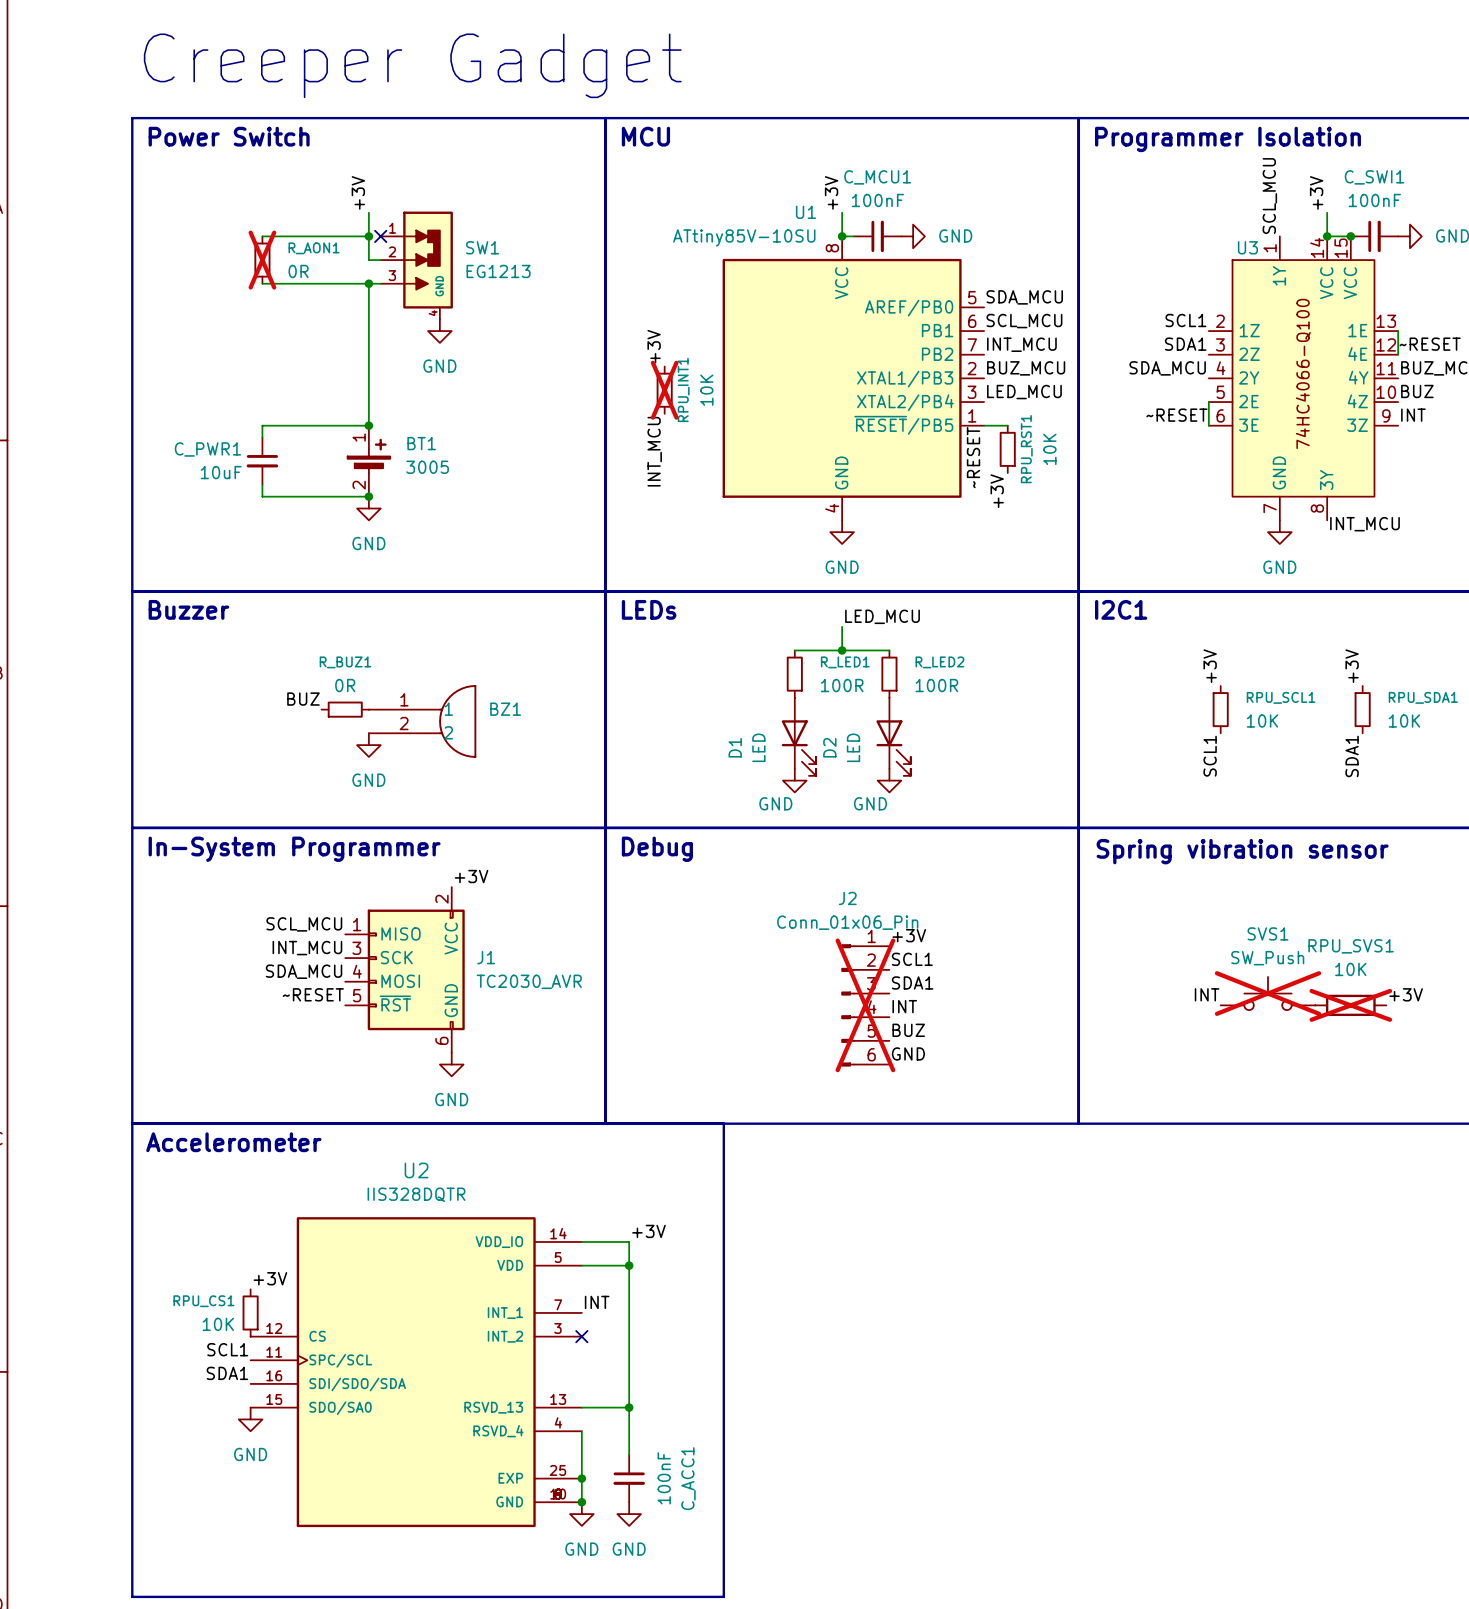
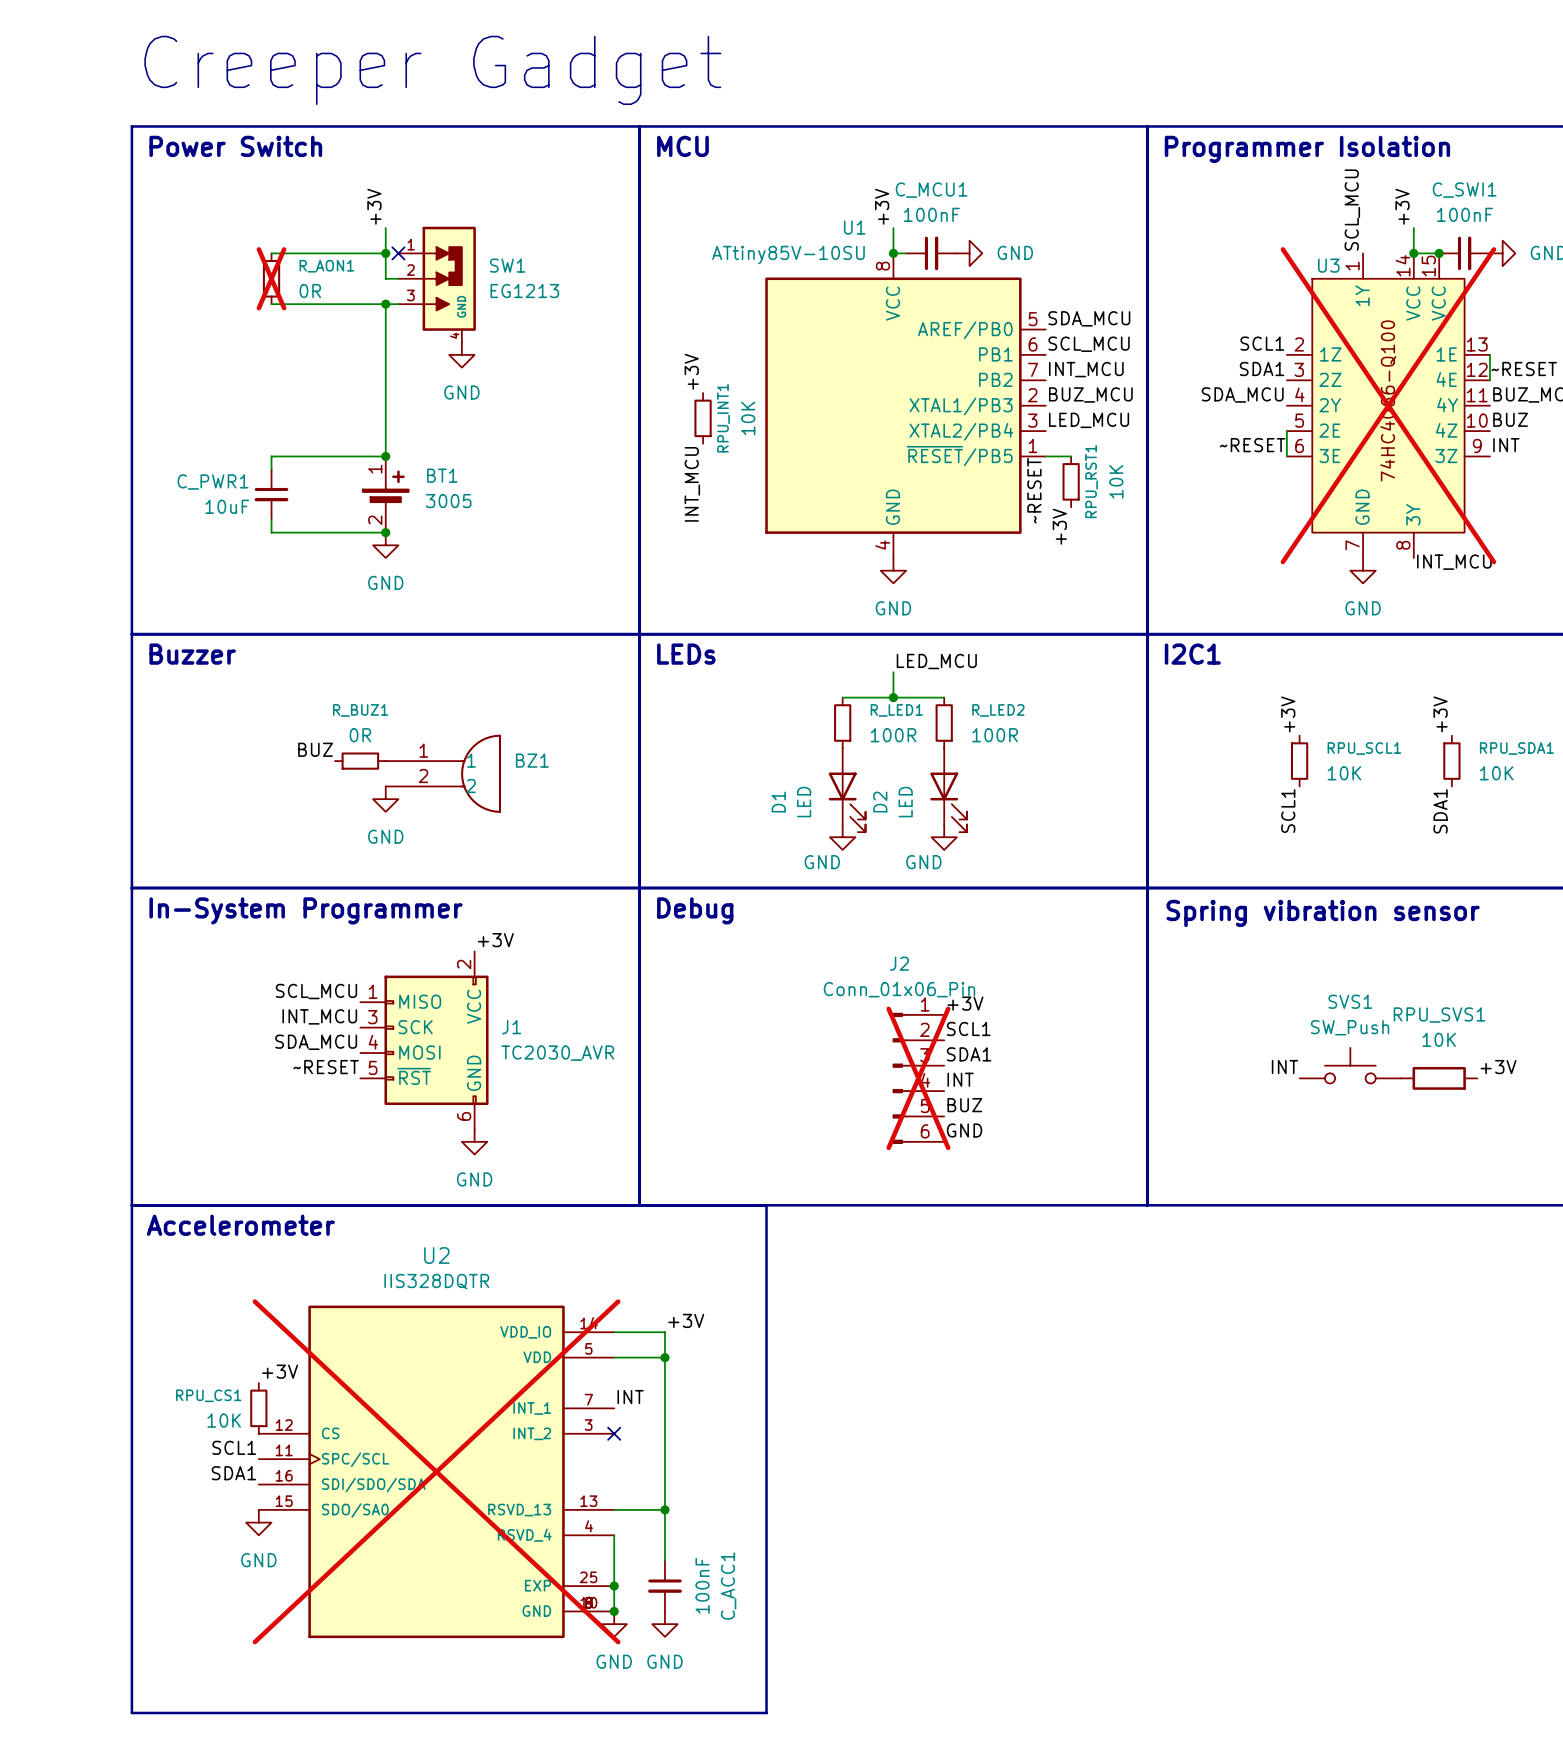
U3 do-not-place cross: none -> (1388, 405)
RPU_INT1 do-not-place cross: (664, 390) -> none
SVS1 do-not-place cross: (1268, 993) -> none
RPU_SVS1 do-not-place cross: (1350, 1005) -> none
U2 do-not-place cross: none -> (436, 1471)

